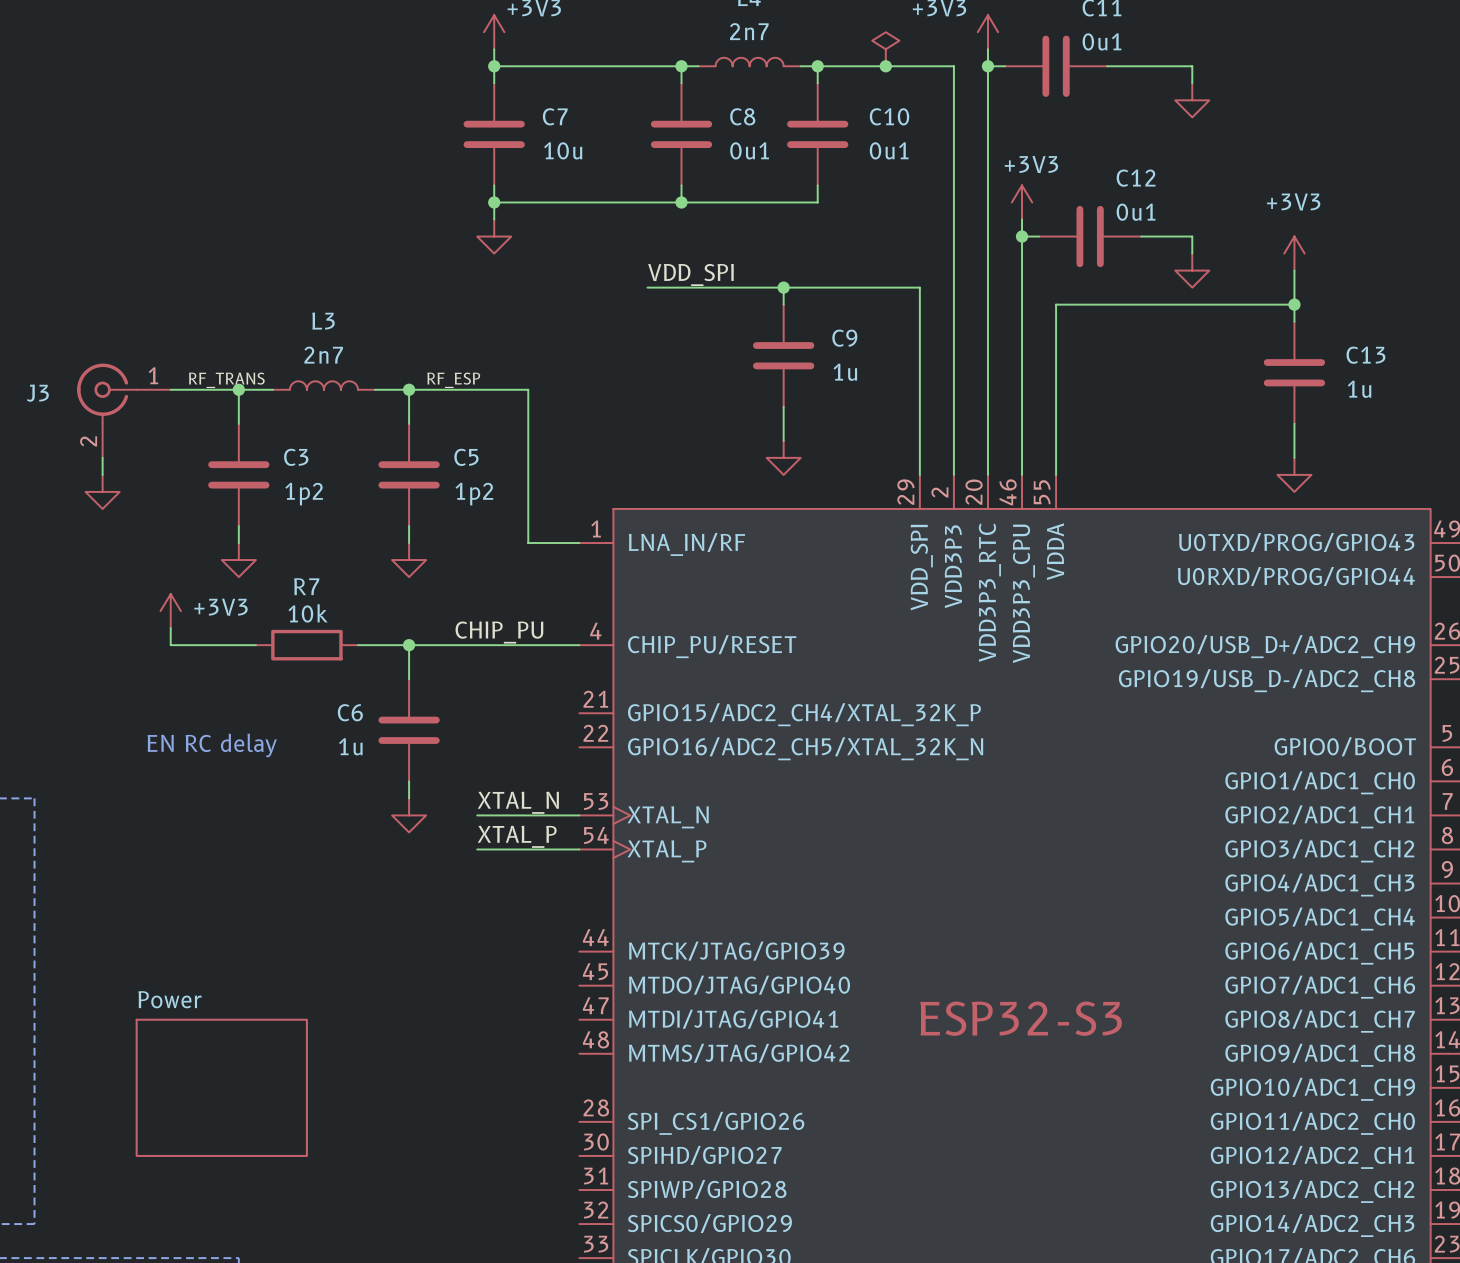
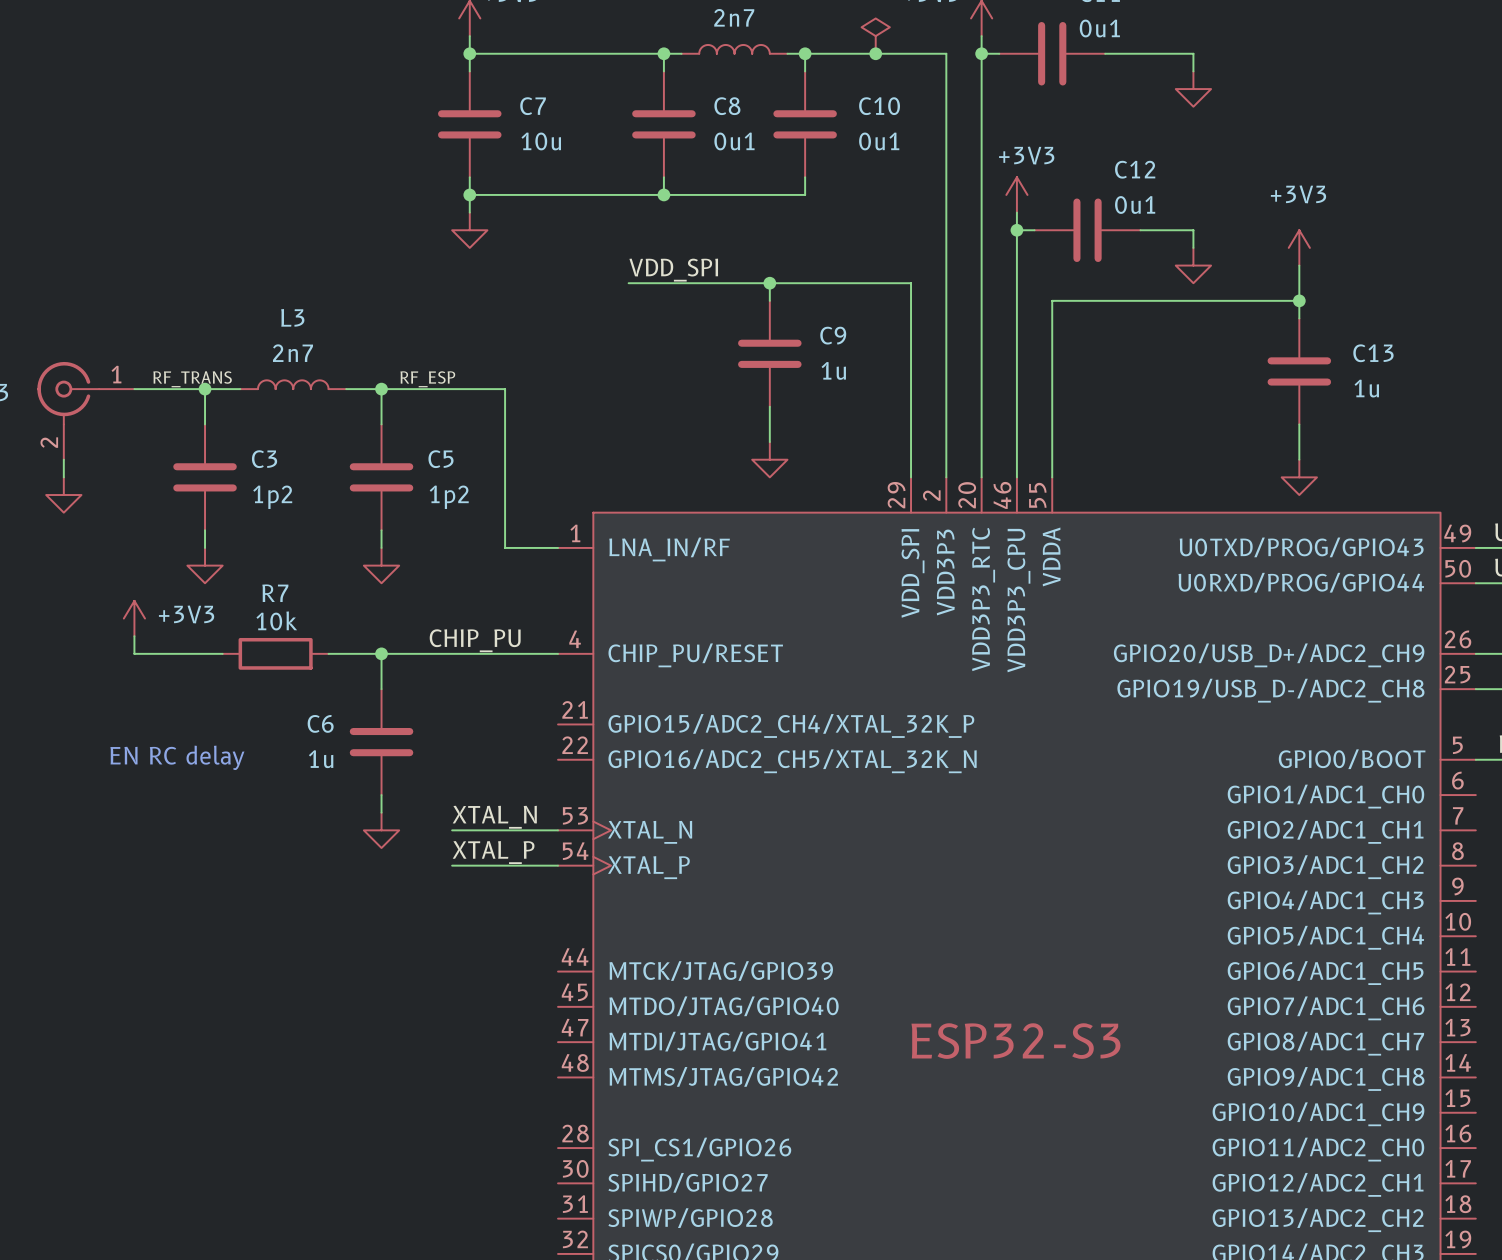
sheet Power: (221, 1087) -> none

